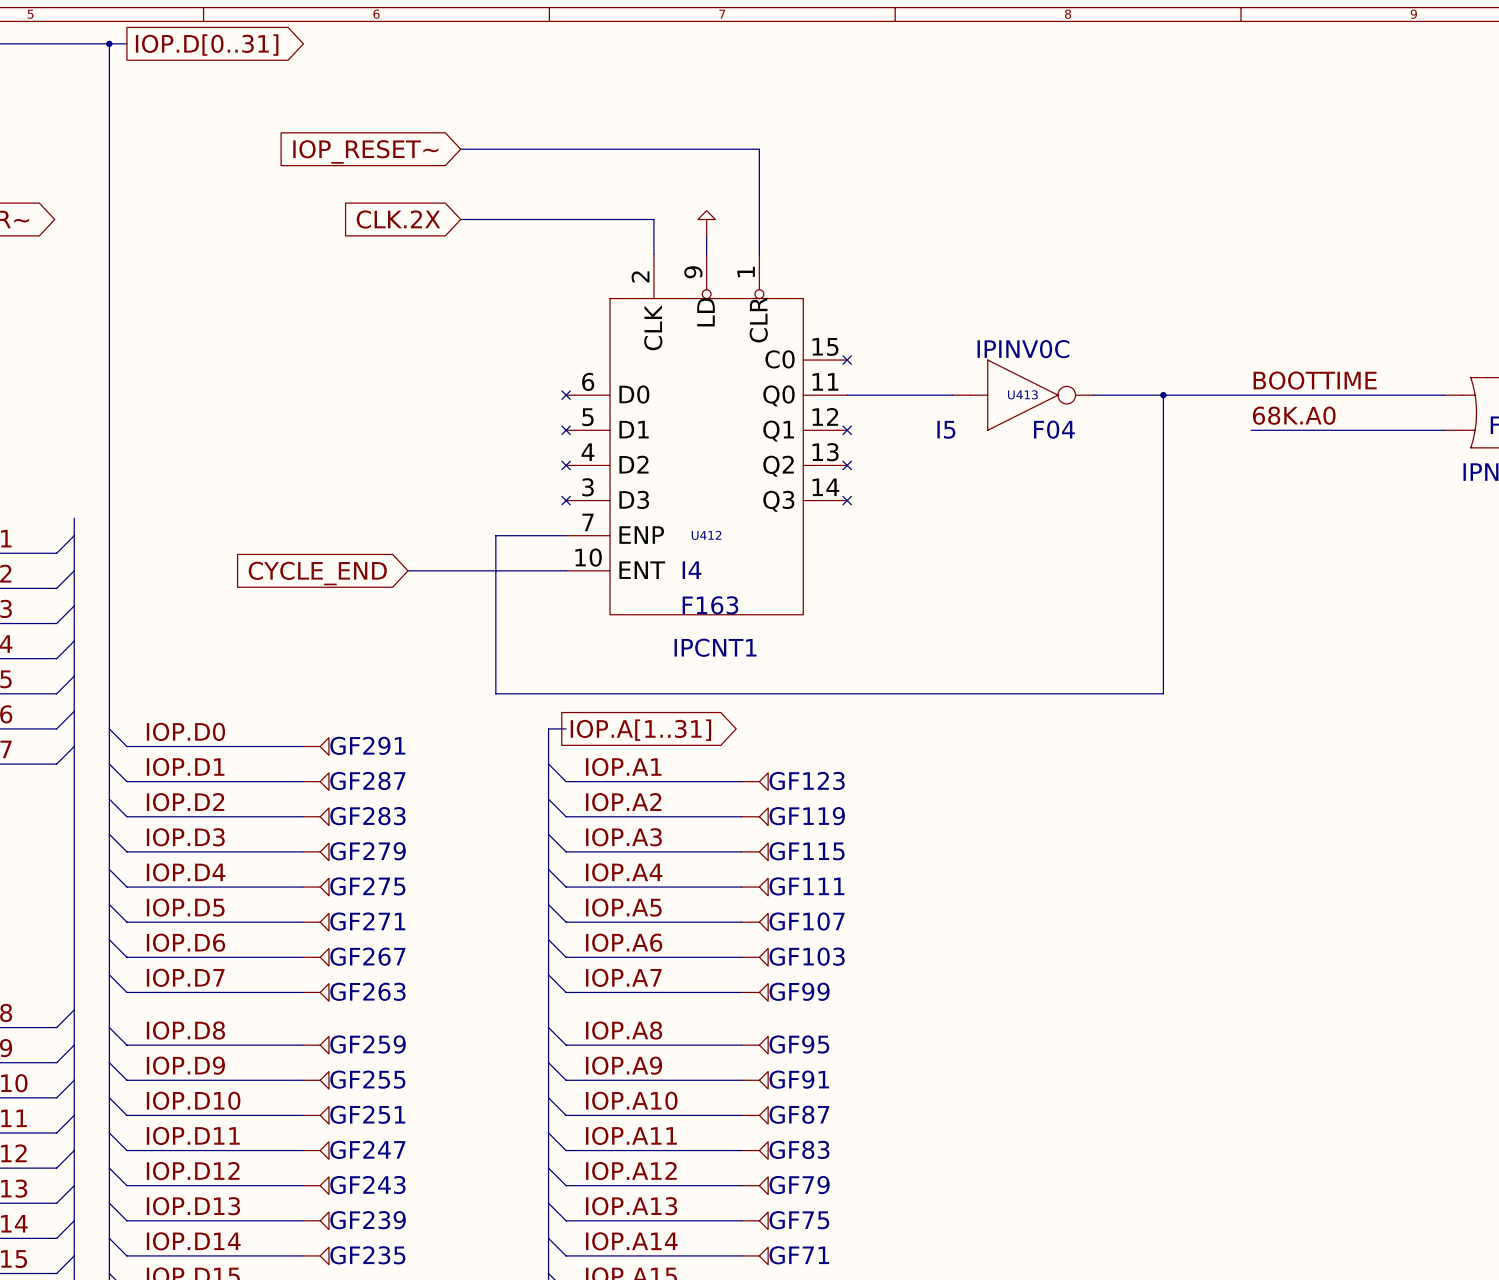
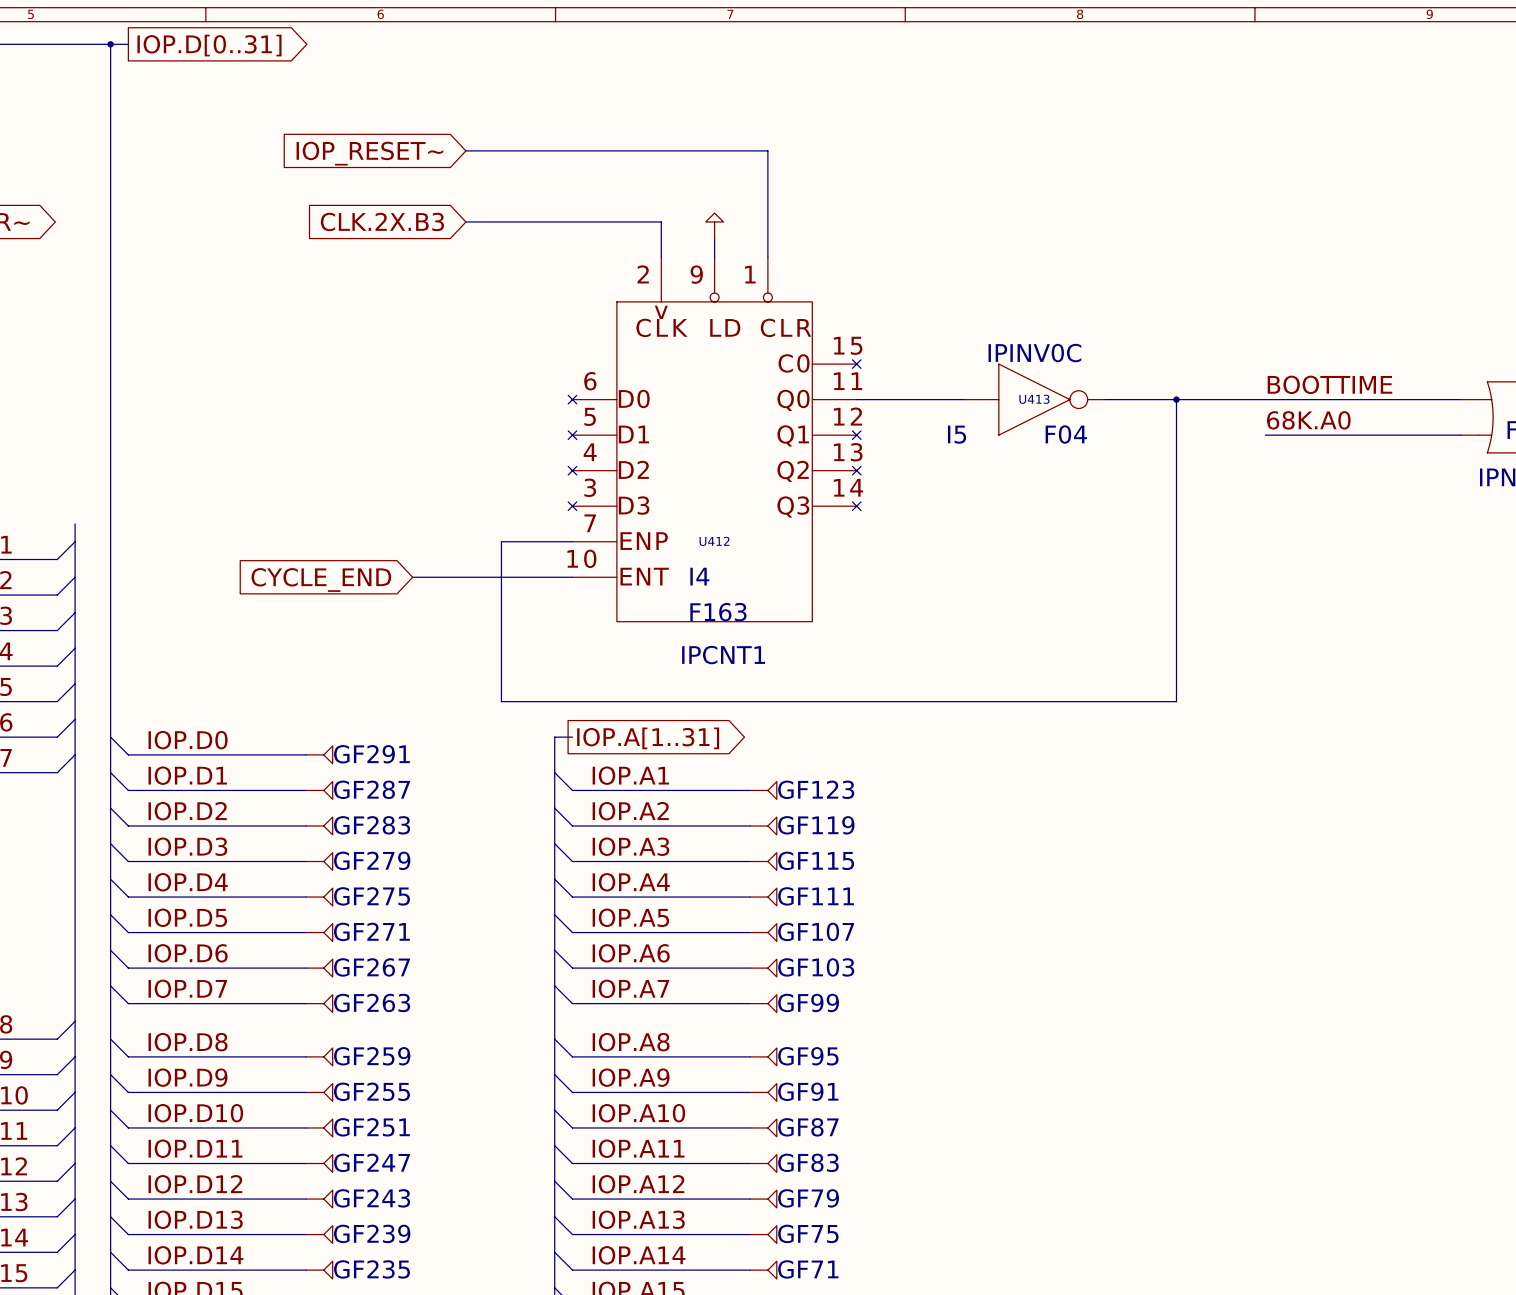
global label: CLK.2X (398, 219) -> CLK.2X.B3 (382, 221)
U412 symbol: [566, 254, 848, 615] -> [572, 257, 857, 622]

